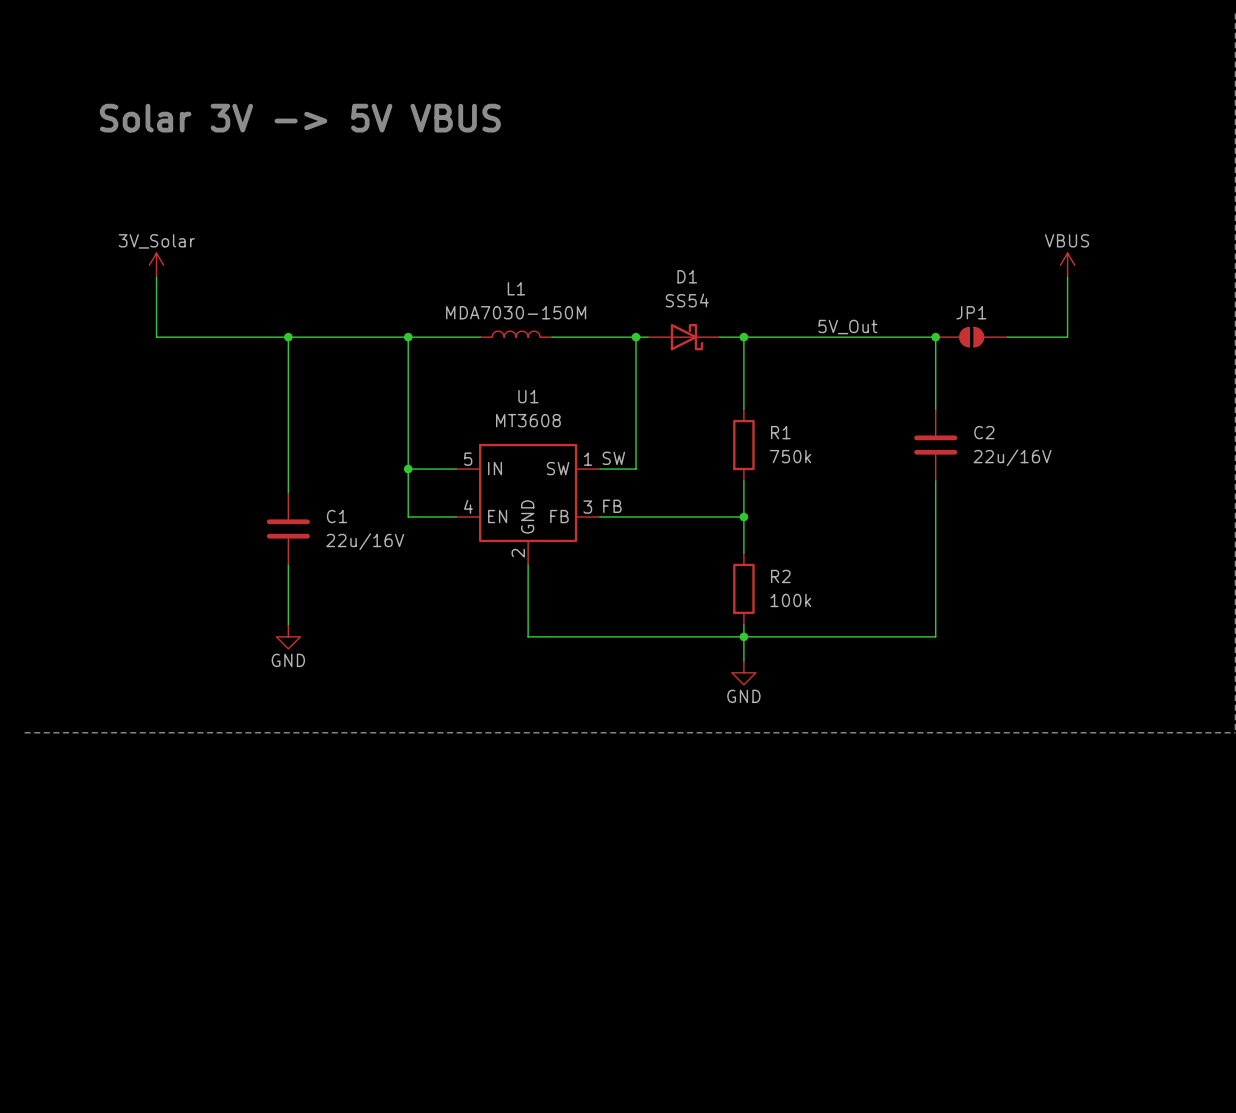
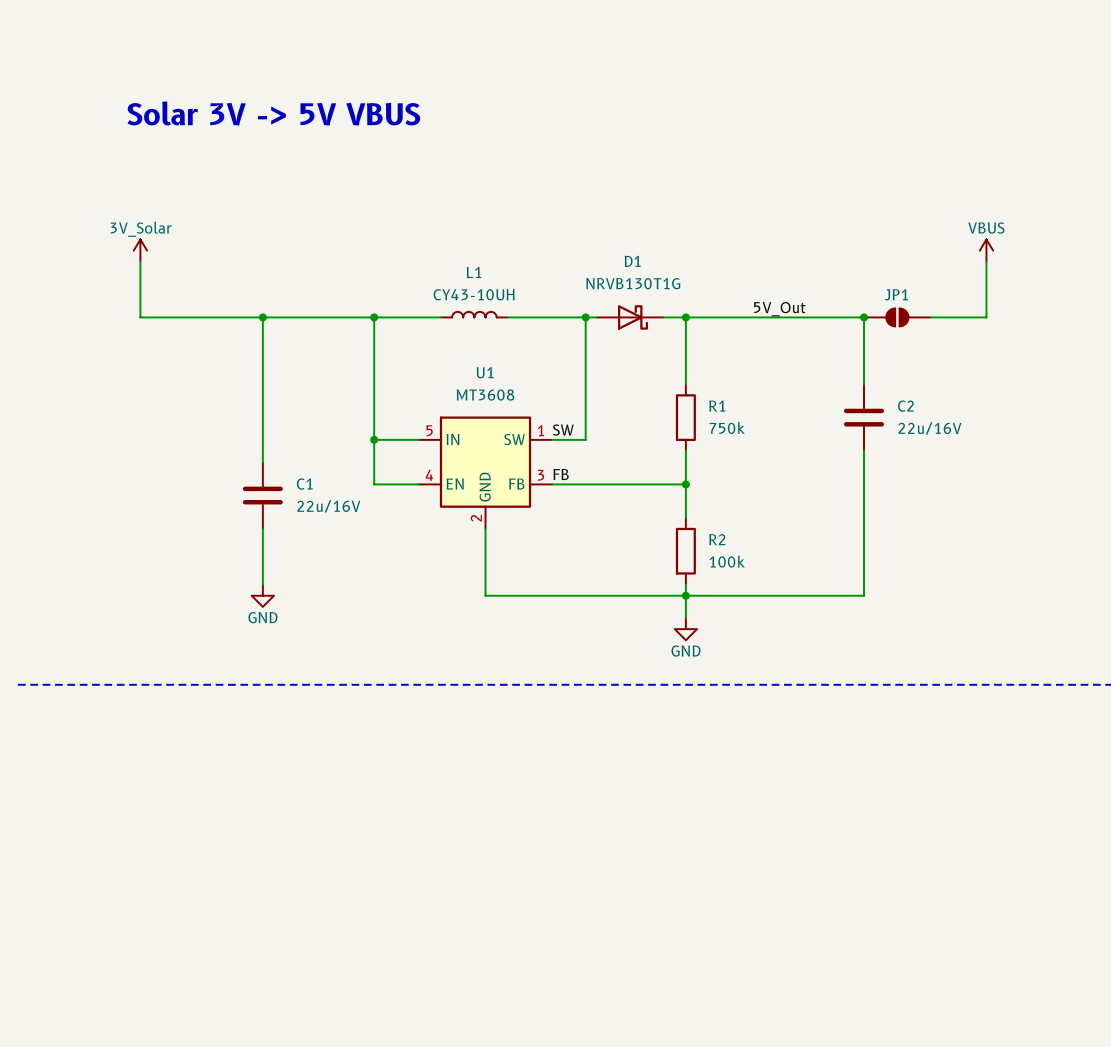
D1 value: SS54 (687, 300) -> NRVB130T1G (633, 283)
L1 value: MDA7030-150M (516, 312) -> CY43-10UH (474, 294)

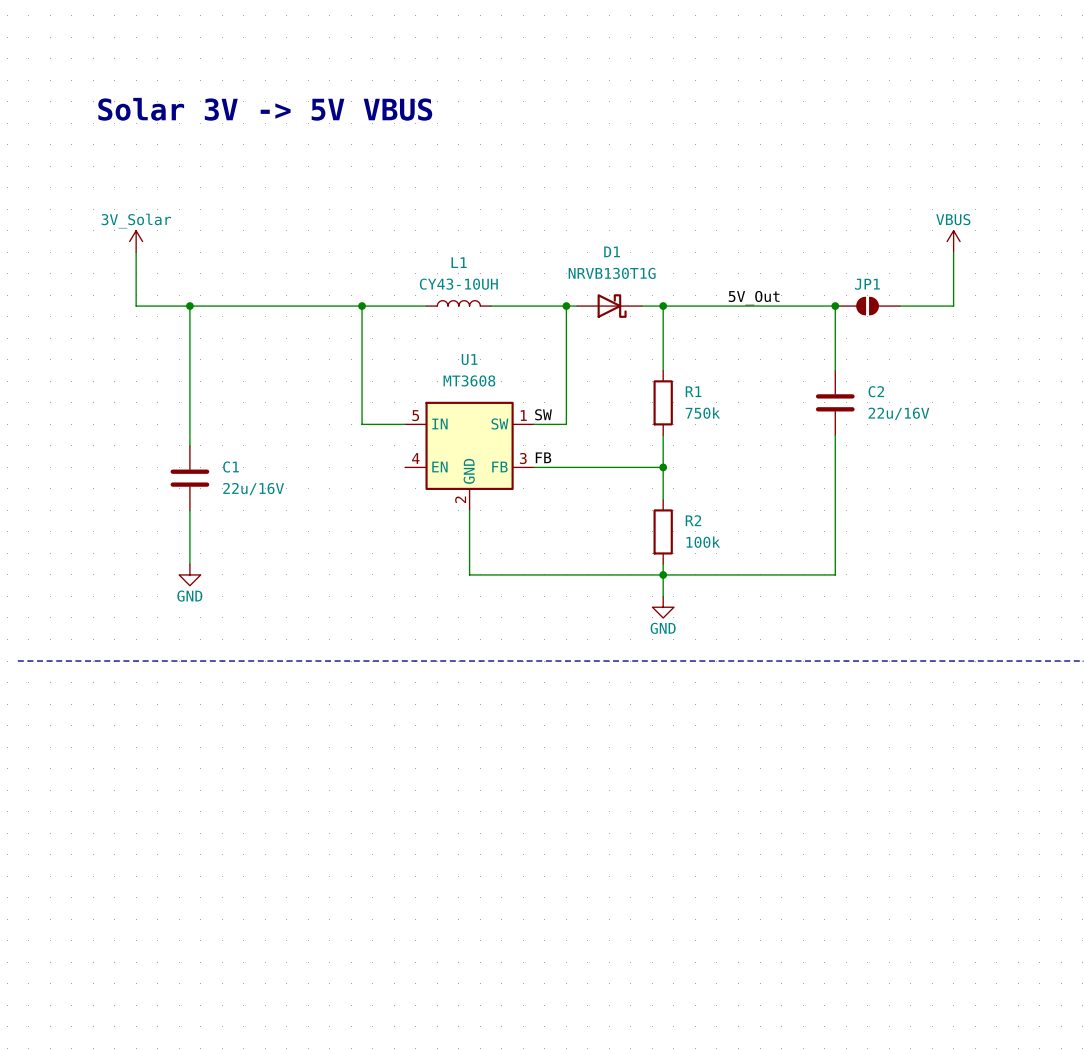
junction: none -> (189, 306)
wire: (262, 317) (262, 462) -> (189, 306) (189, 445)
junction: (262, 317) -> none
wire: (374, 439) (374, 484) (418, 484) -> none
junction: (374, 439) -> none
C1 position: (262, 495) -> (189, 478)
wire: (262, 528) (262, 584) -> (189, 510) (189, 564)
power symbol position: GND (262, 595) -> GND (189, 574)

